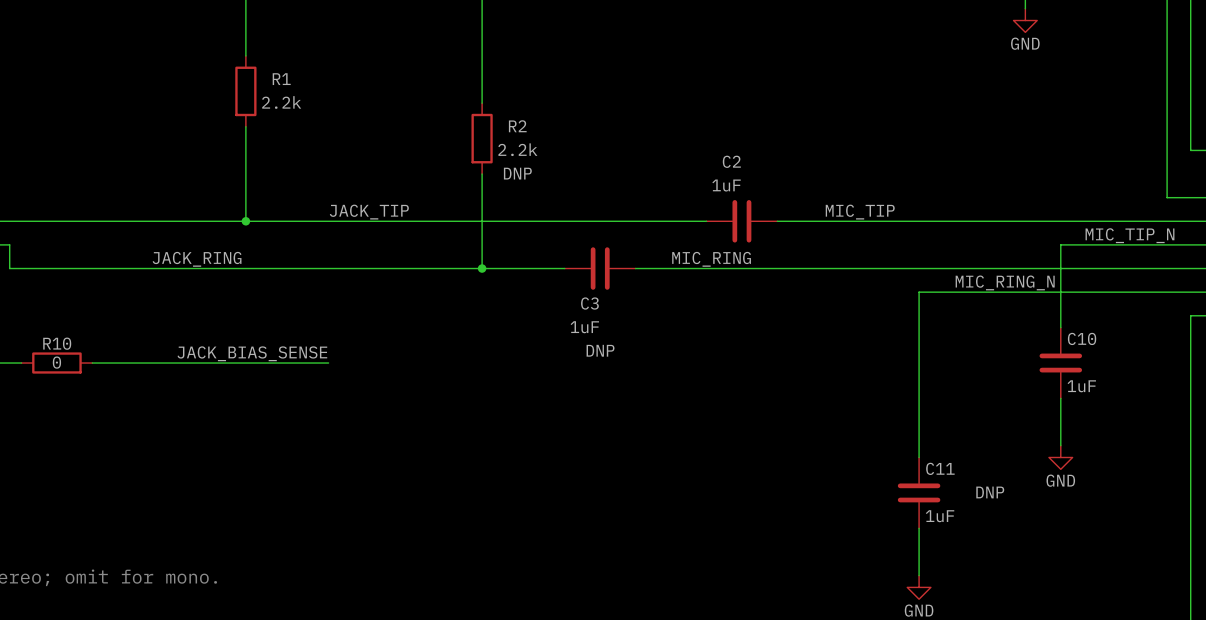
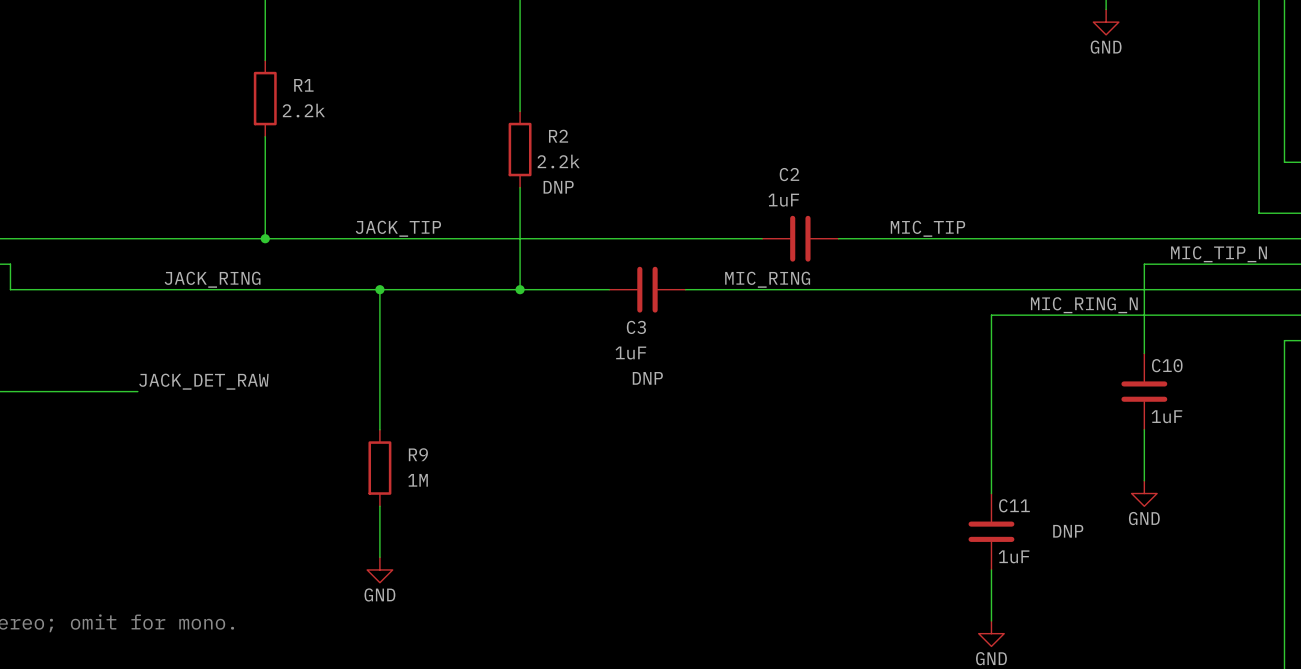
wire: none -> (379, 289) (379, 429)
junction: none -> (379, 289)
label: none -> JACK_DET_RAW (203, 381)
label: JACK_BIAS_SENSE (252, 353) -> none
wire: none -> (23, 391) (99, 391)
R10: 0 (56, 363) -> none
wire: (127, 363) (328, 363) -> none
R9: none -> 1M (379, 468)
wire: none -> (379, 506) (379, 557)
power symbol: none -> GND (379, 569)

